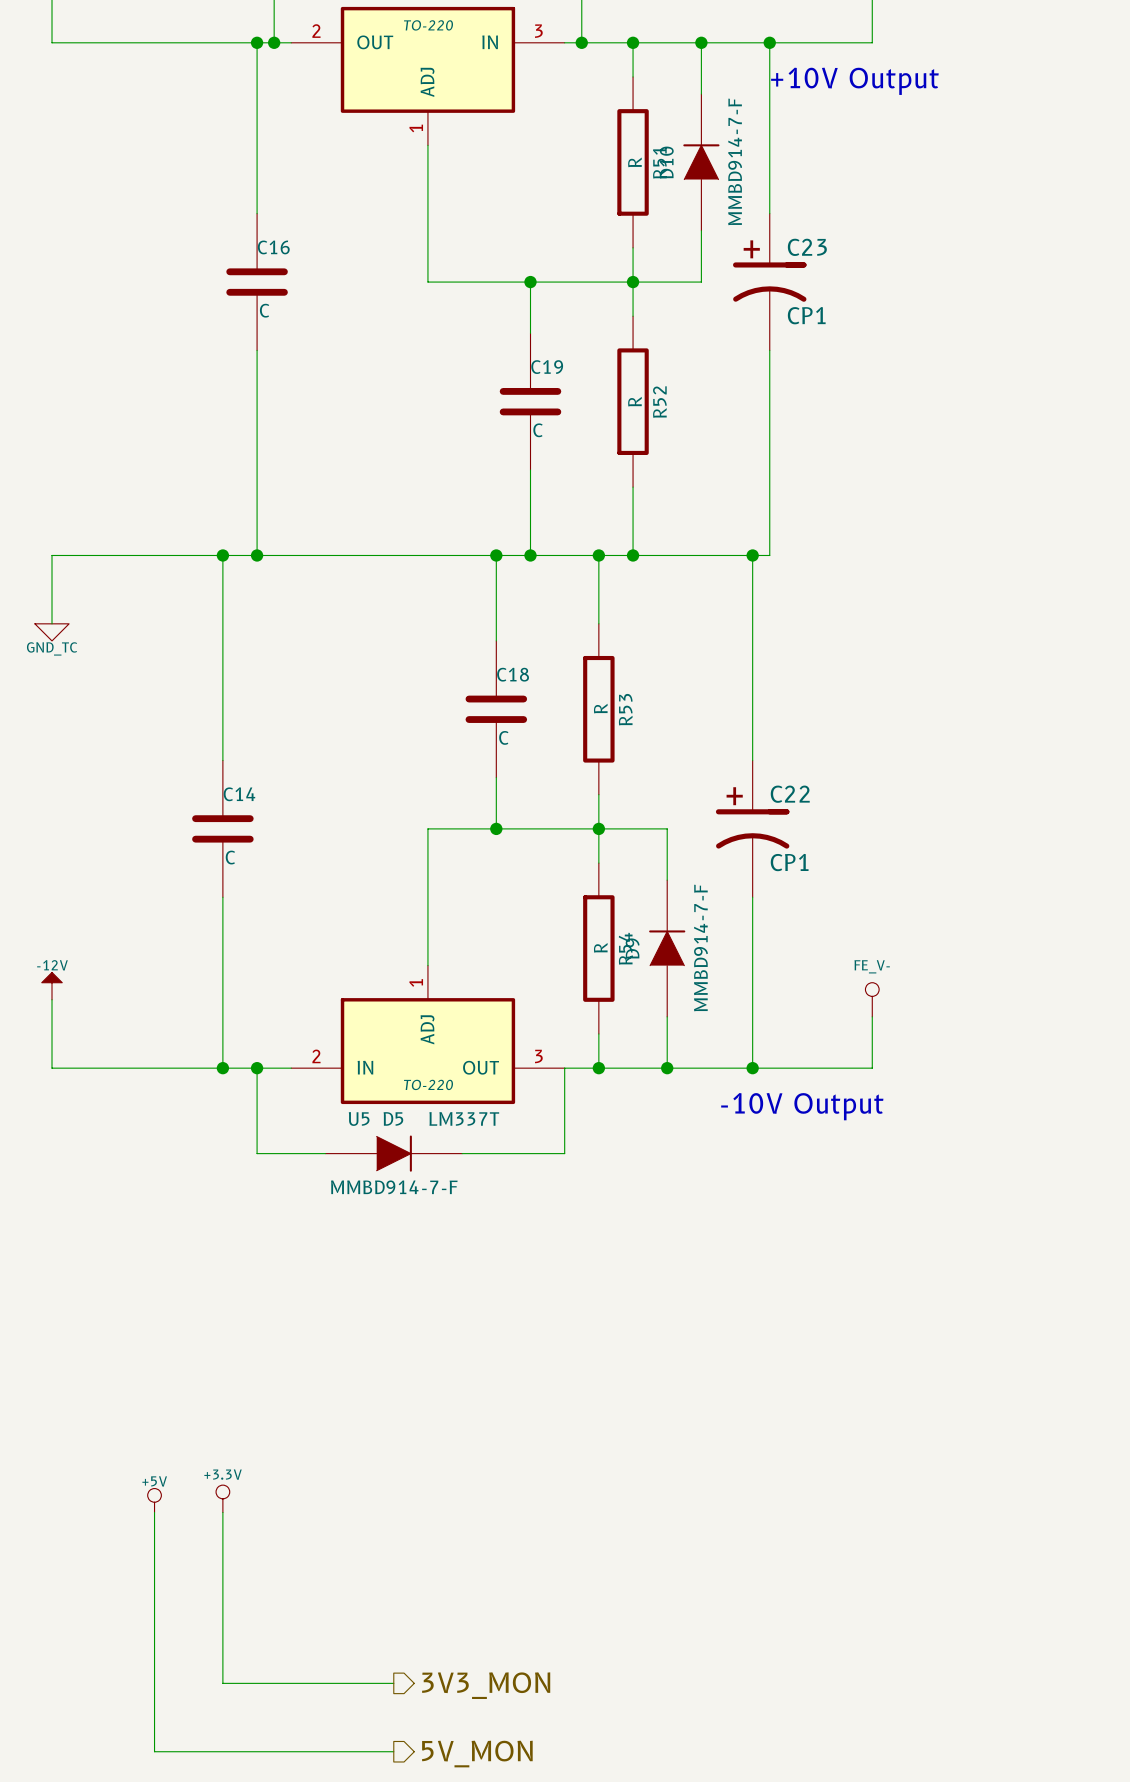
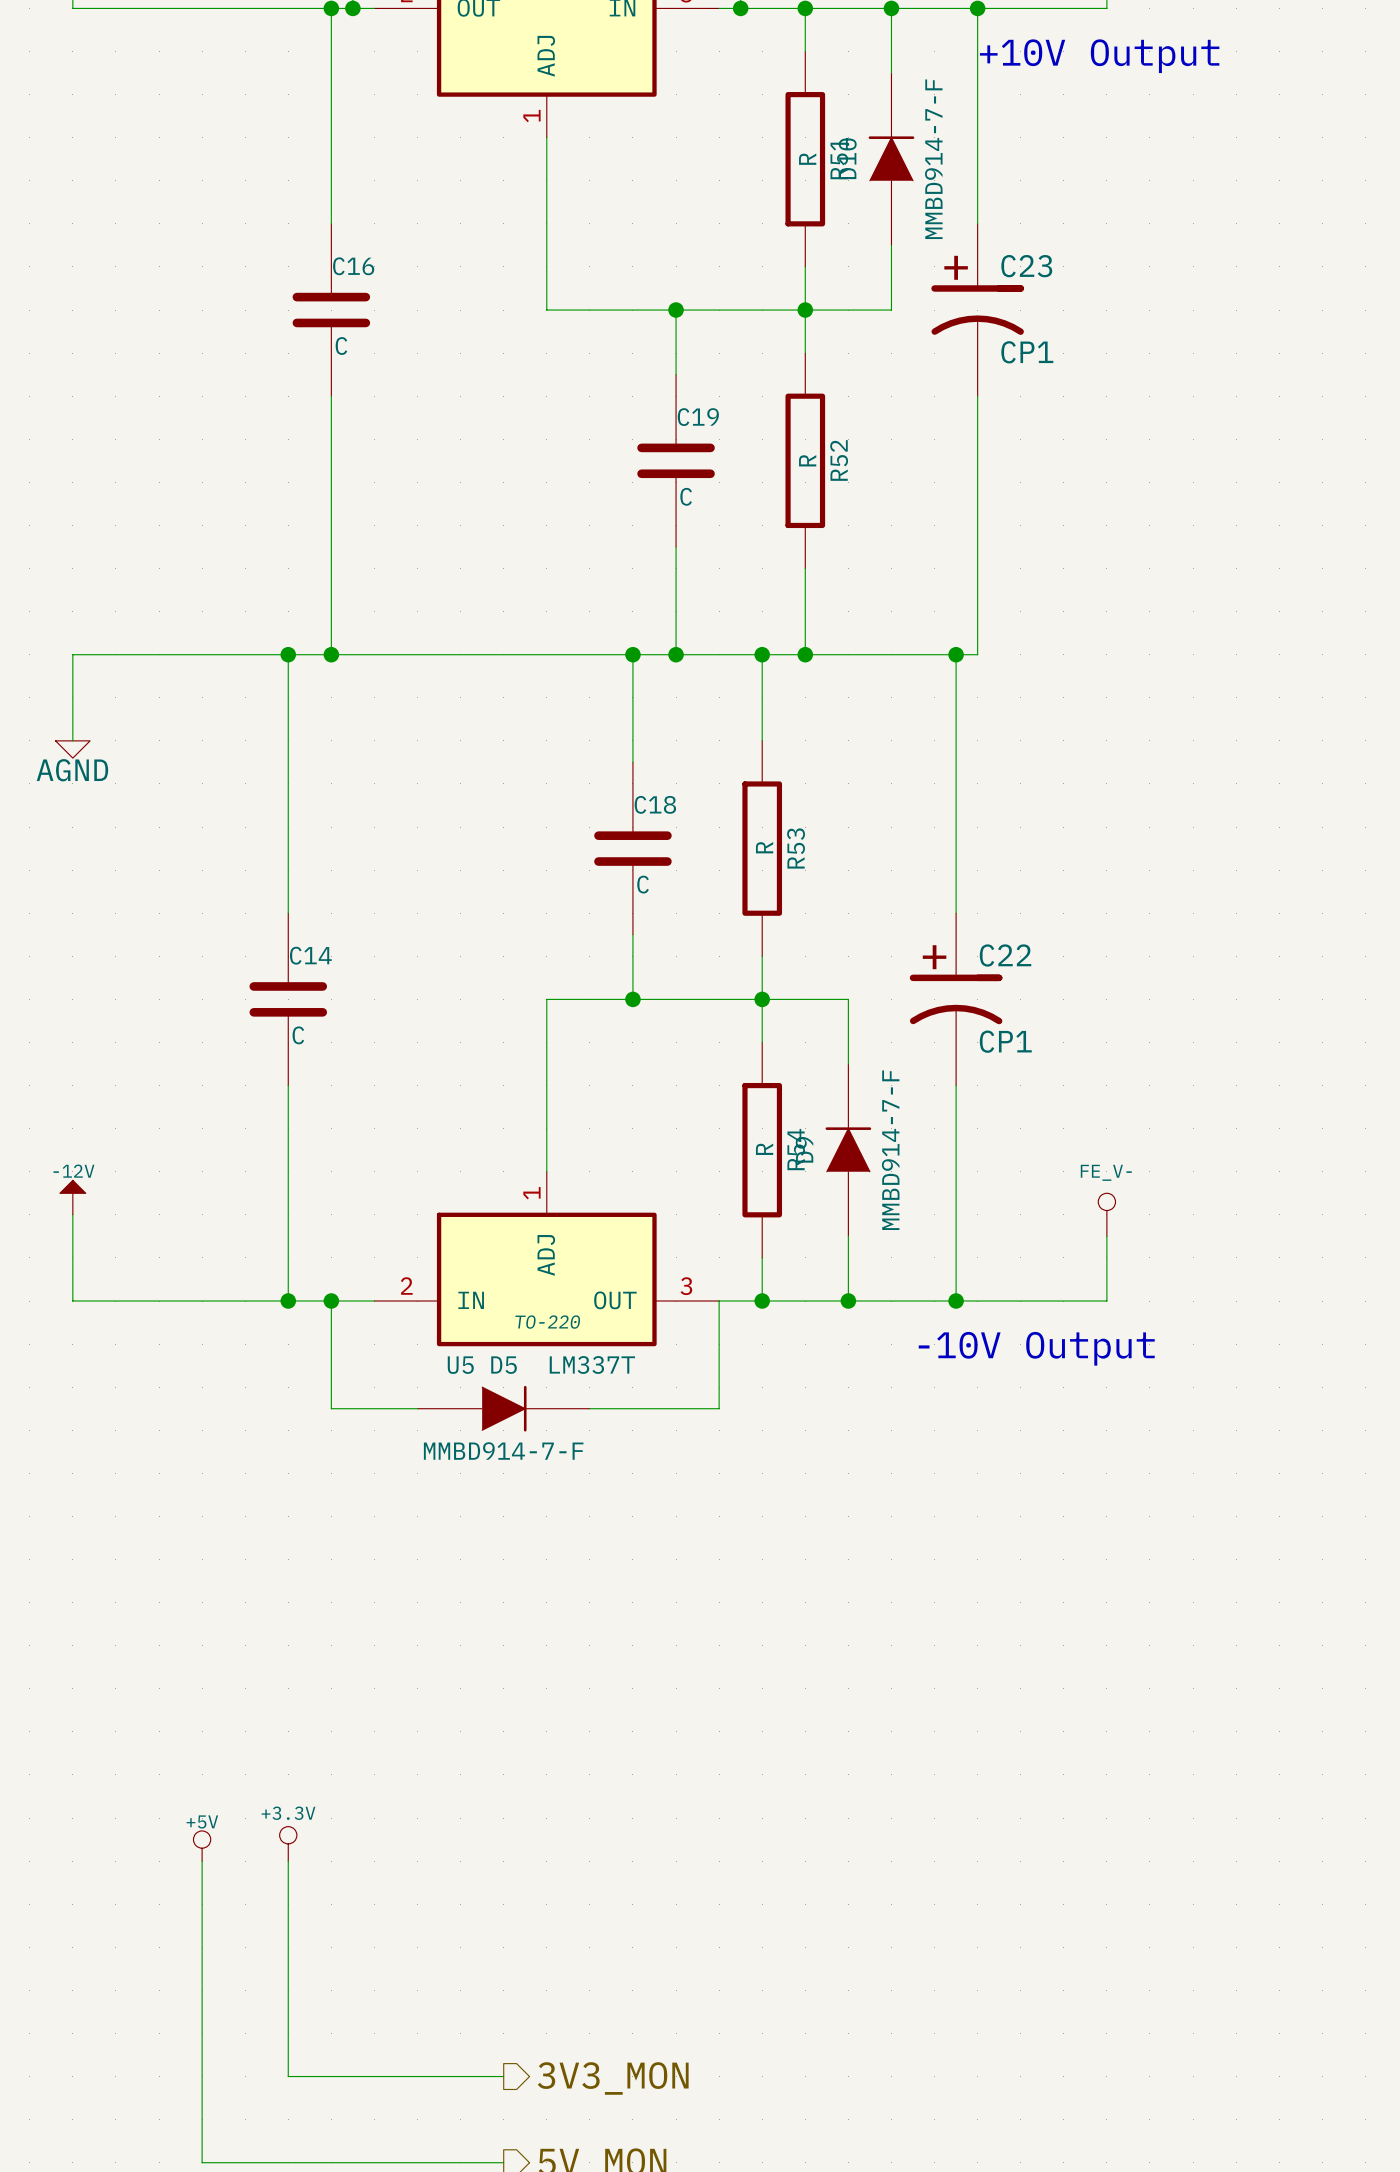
power symbol: GND_TC (52, 632) -> AGND (72, 749)

